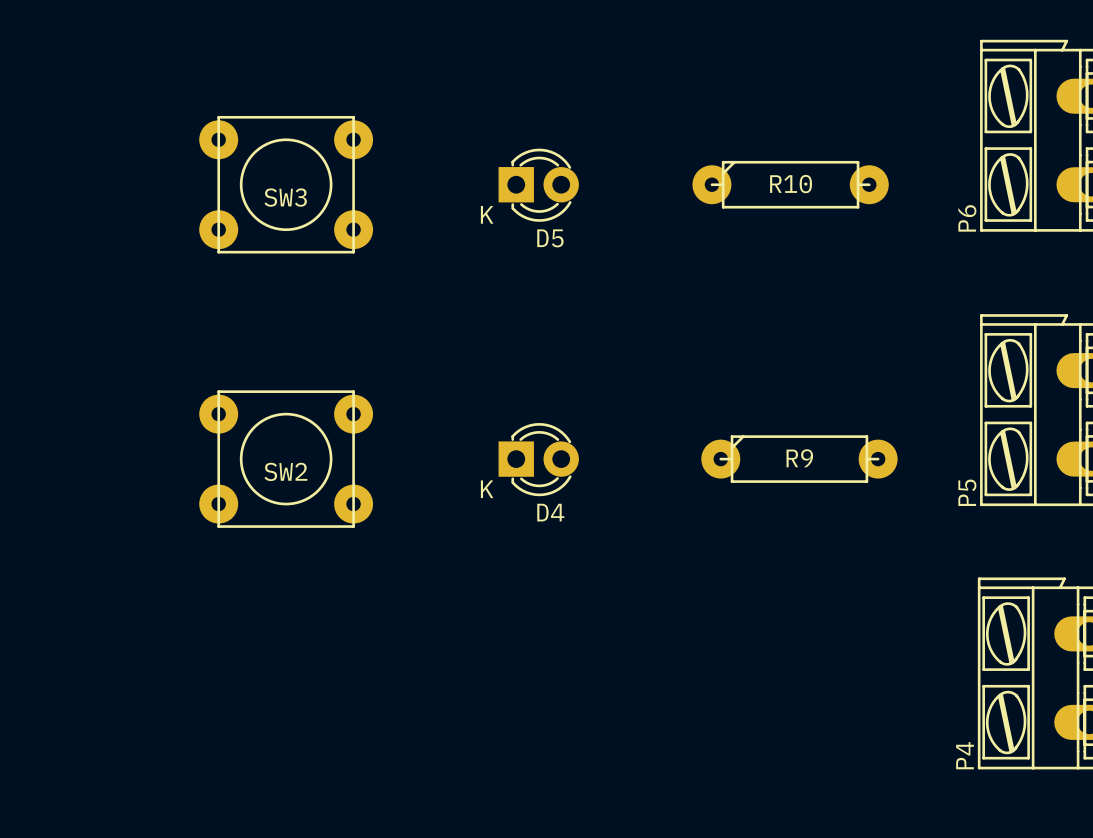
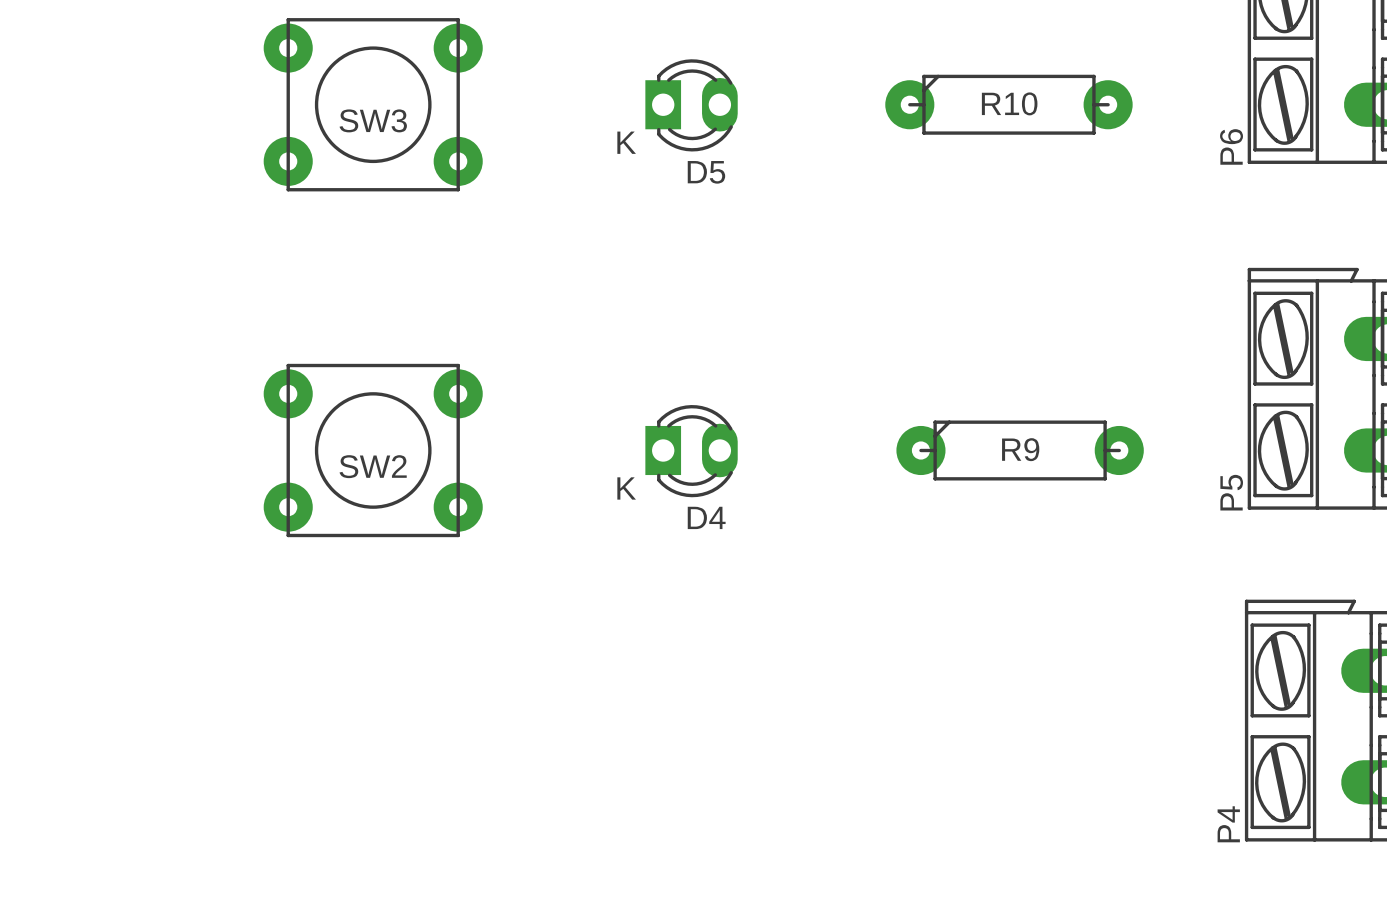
D5 footprint: [498, 148, 579, 222] -> [645, 59, 738, 152]
D4 footprint: [498, 423, 579, 497] -> [645, 405, 738, 498]

